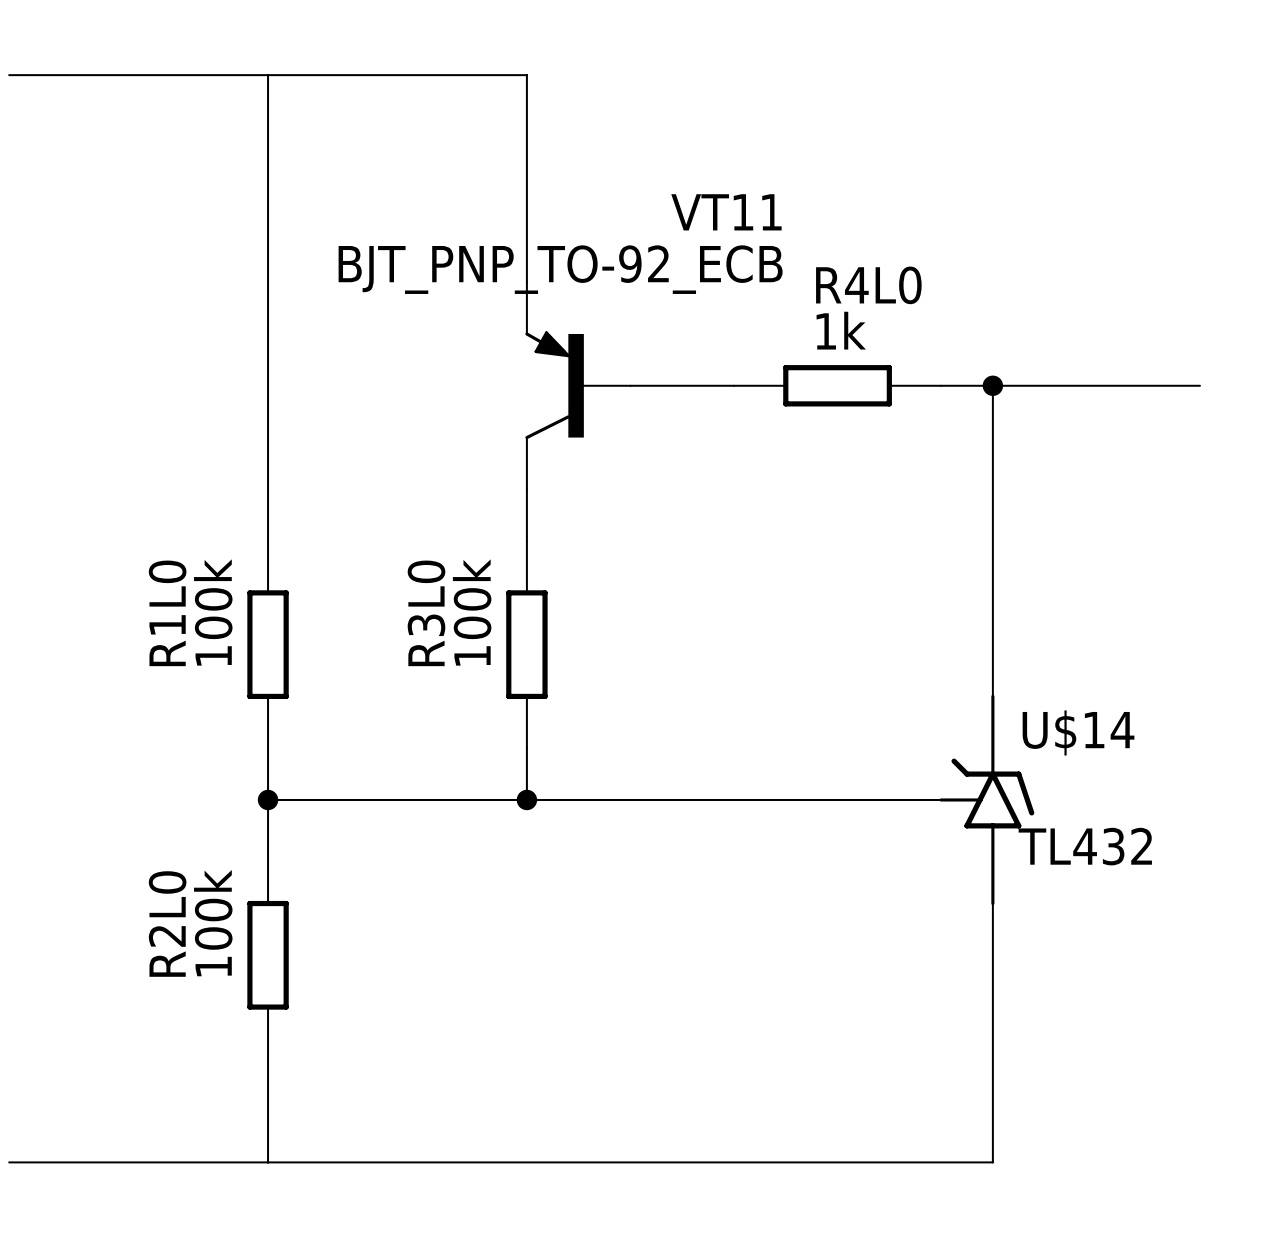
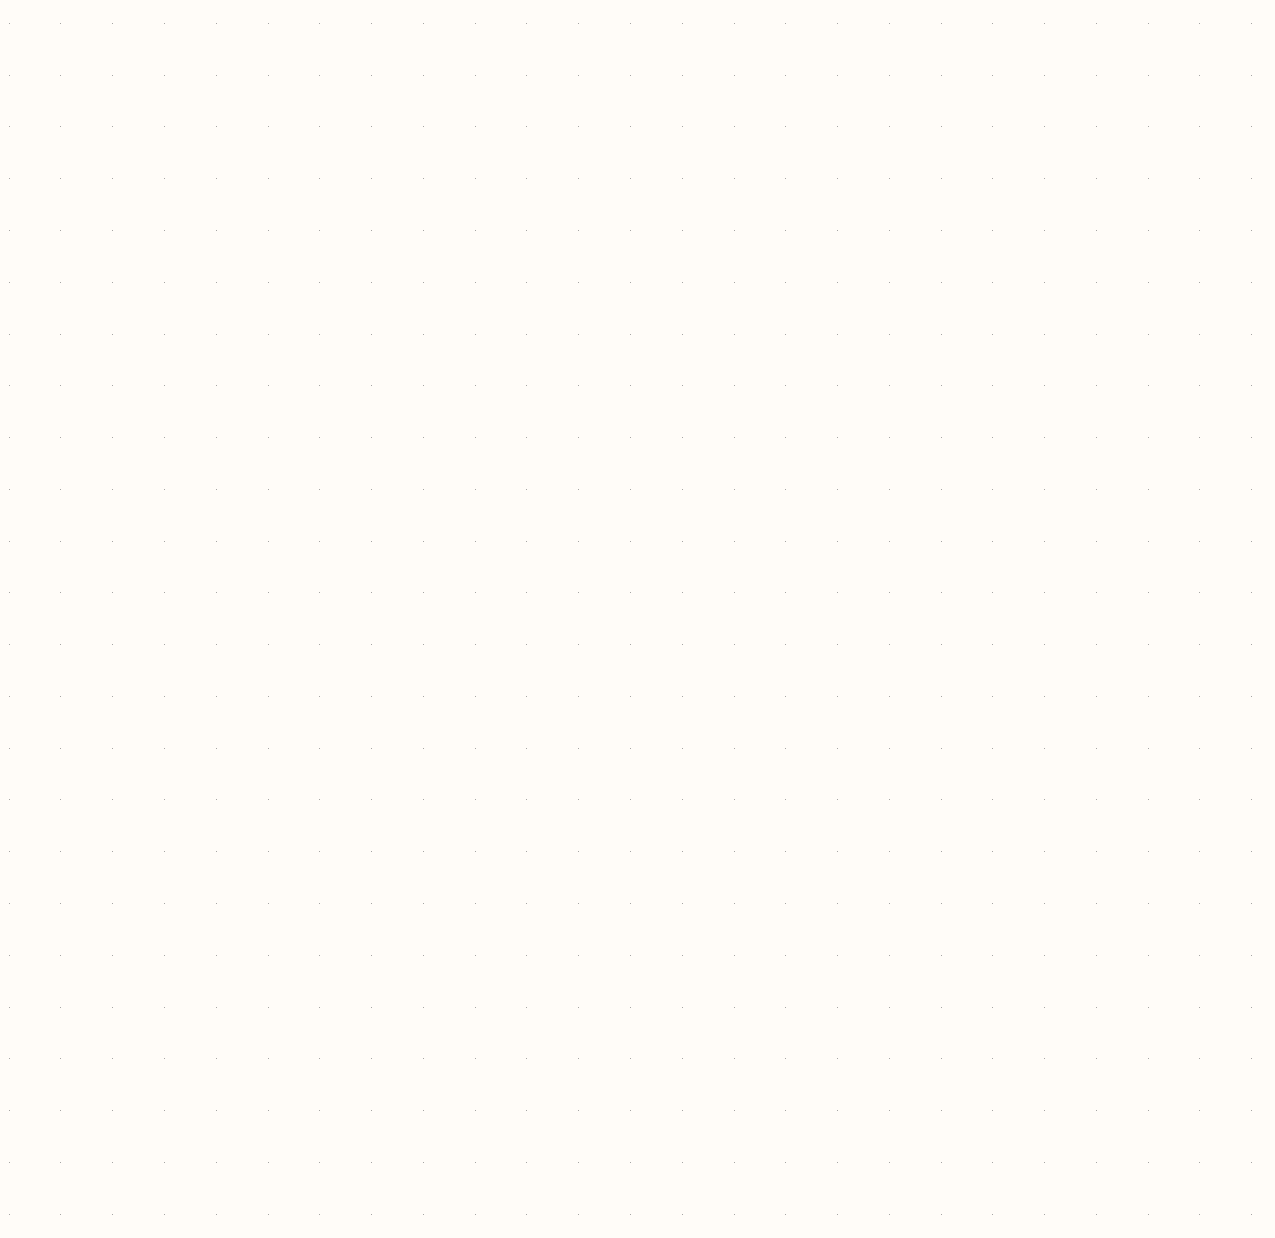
wire: (9, 75) (526, 75) (526, 282) -> none
wire: (268, 75) (268, 541) -> none
VT11: BJT_PNP_TO-92_ECB (577, 385) -> none
wire: (630, 385) (734, 385) -> none
R4L0: 1k (837, 385) -> none
wire: (941, 385) (1199, 385) -> none
wire: (992, 385) (992, 696) -> none
junction: (992, 385) -> none
wire: (526, 489) (526, 541) -> none
R1L0: 100k (268, 644) -> none
R3L0: 100k (526, 644) -> none
wire: (268, 748) (268, 851) -> none
wire: (526, 748) (526, 799) -> none
wire: (268, 799) (941, 799) -> none
junction: (268, 799) -> none
junction: (526, 799) -> none
U$14: TL432 (986, 799) -> none
wire: (992, 903) (992, 1162) (9, 1162) -> none
R2L0: 100k (268, 955) -> none
wire: (268, 1058) (268, 1162) -> none

